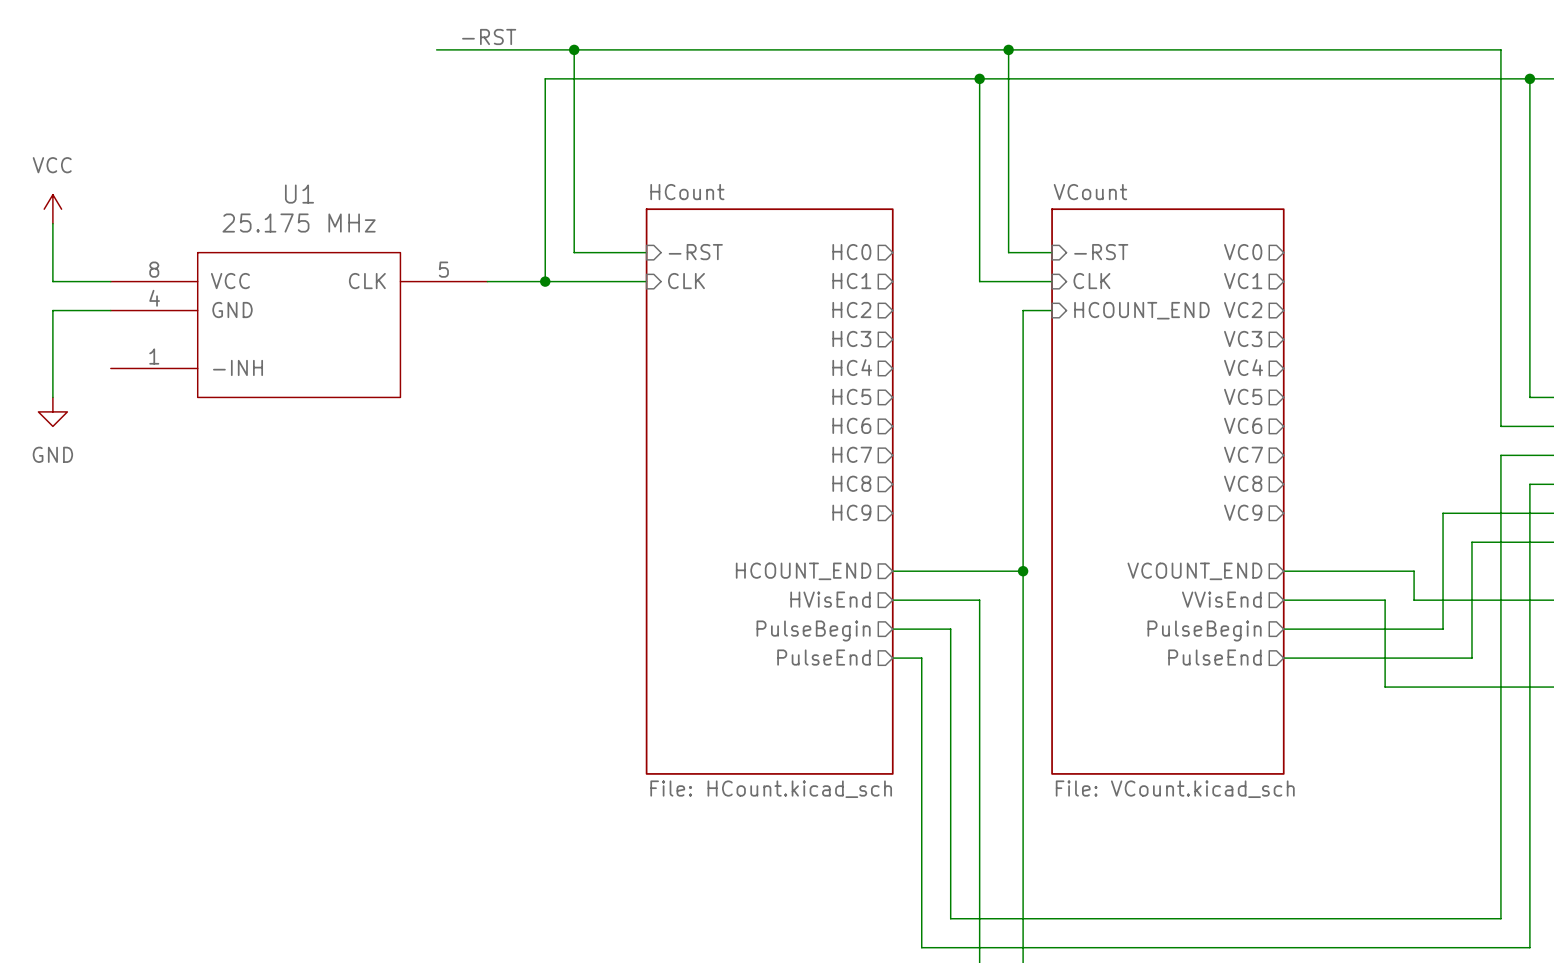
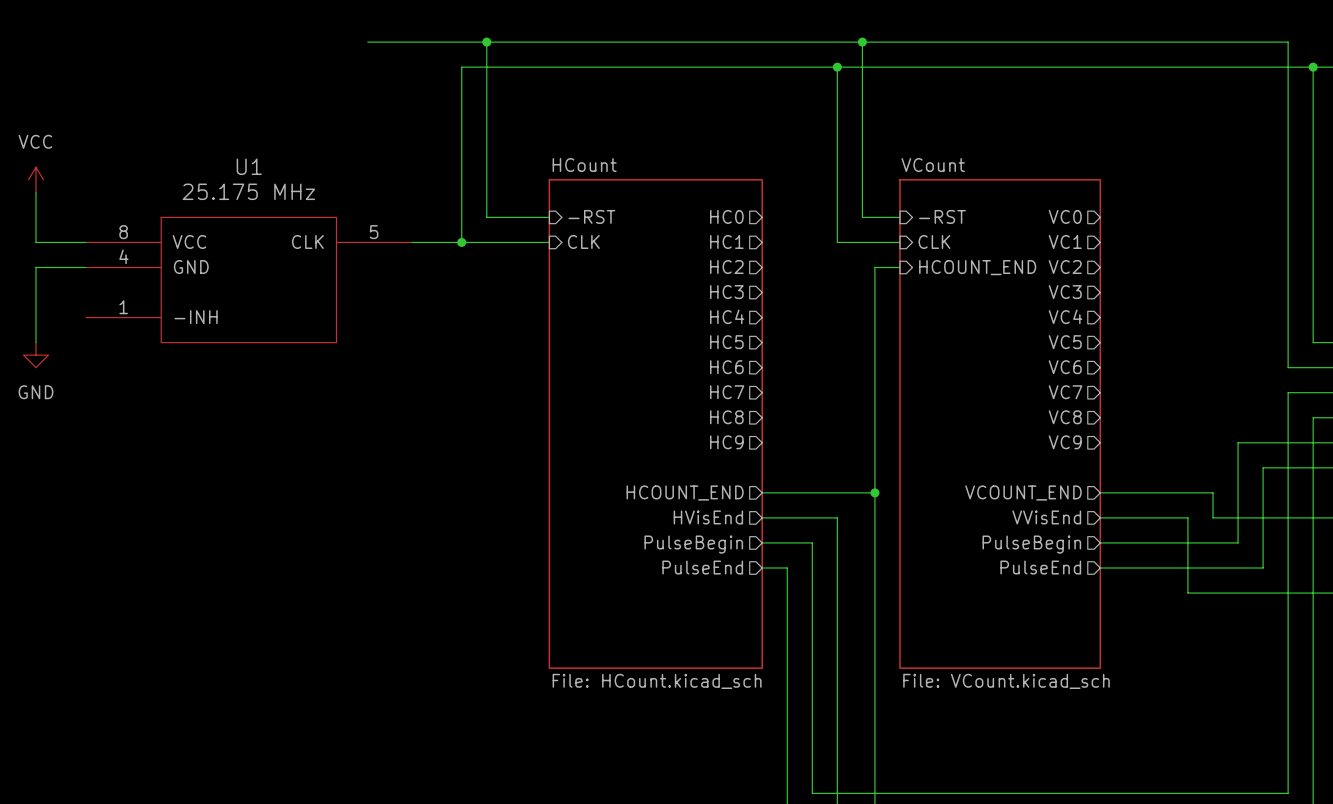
label: -RST (489, 36) -> none

